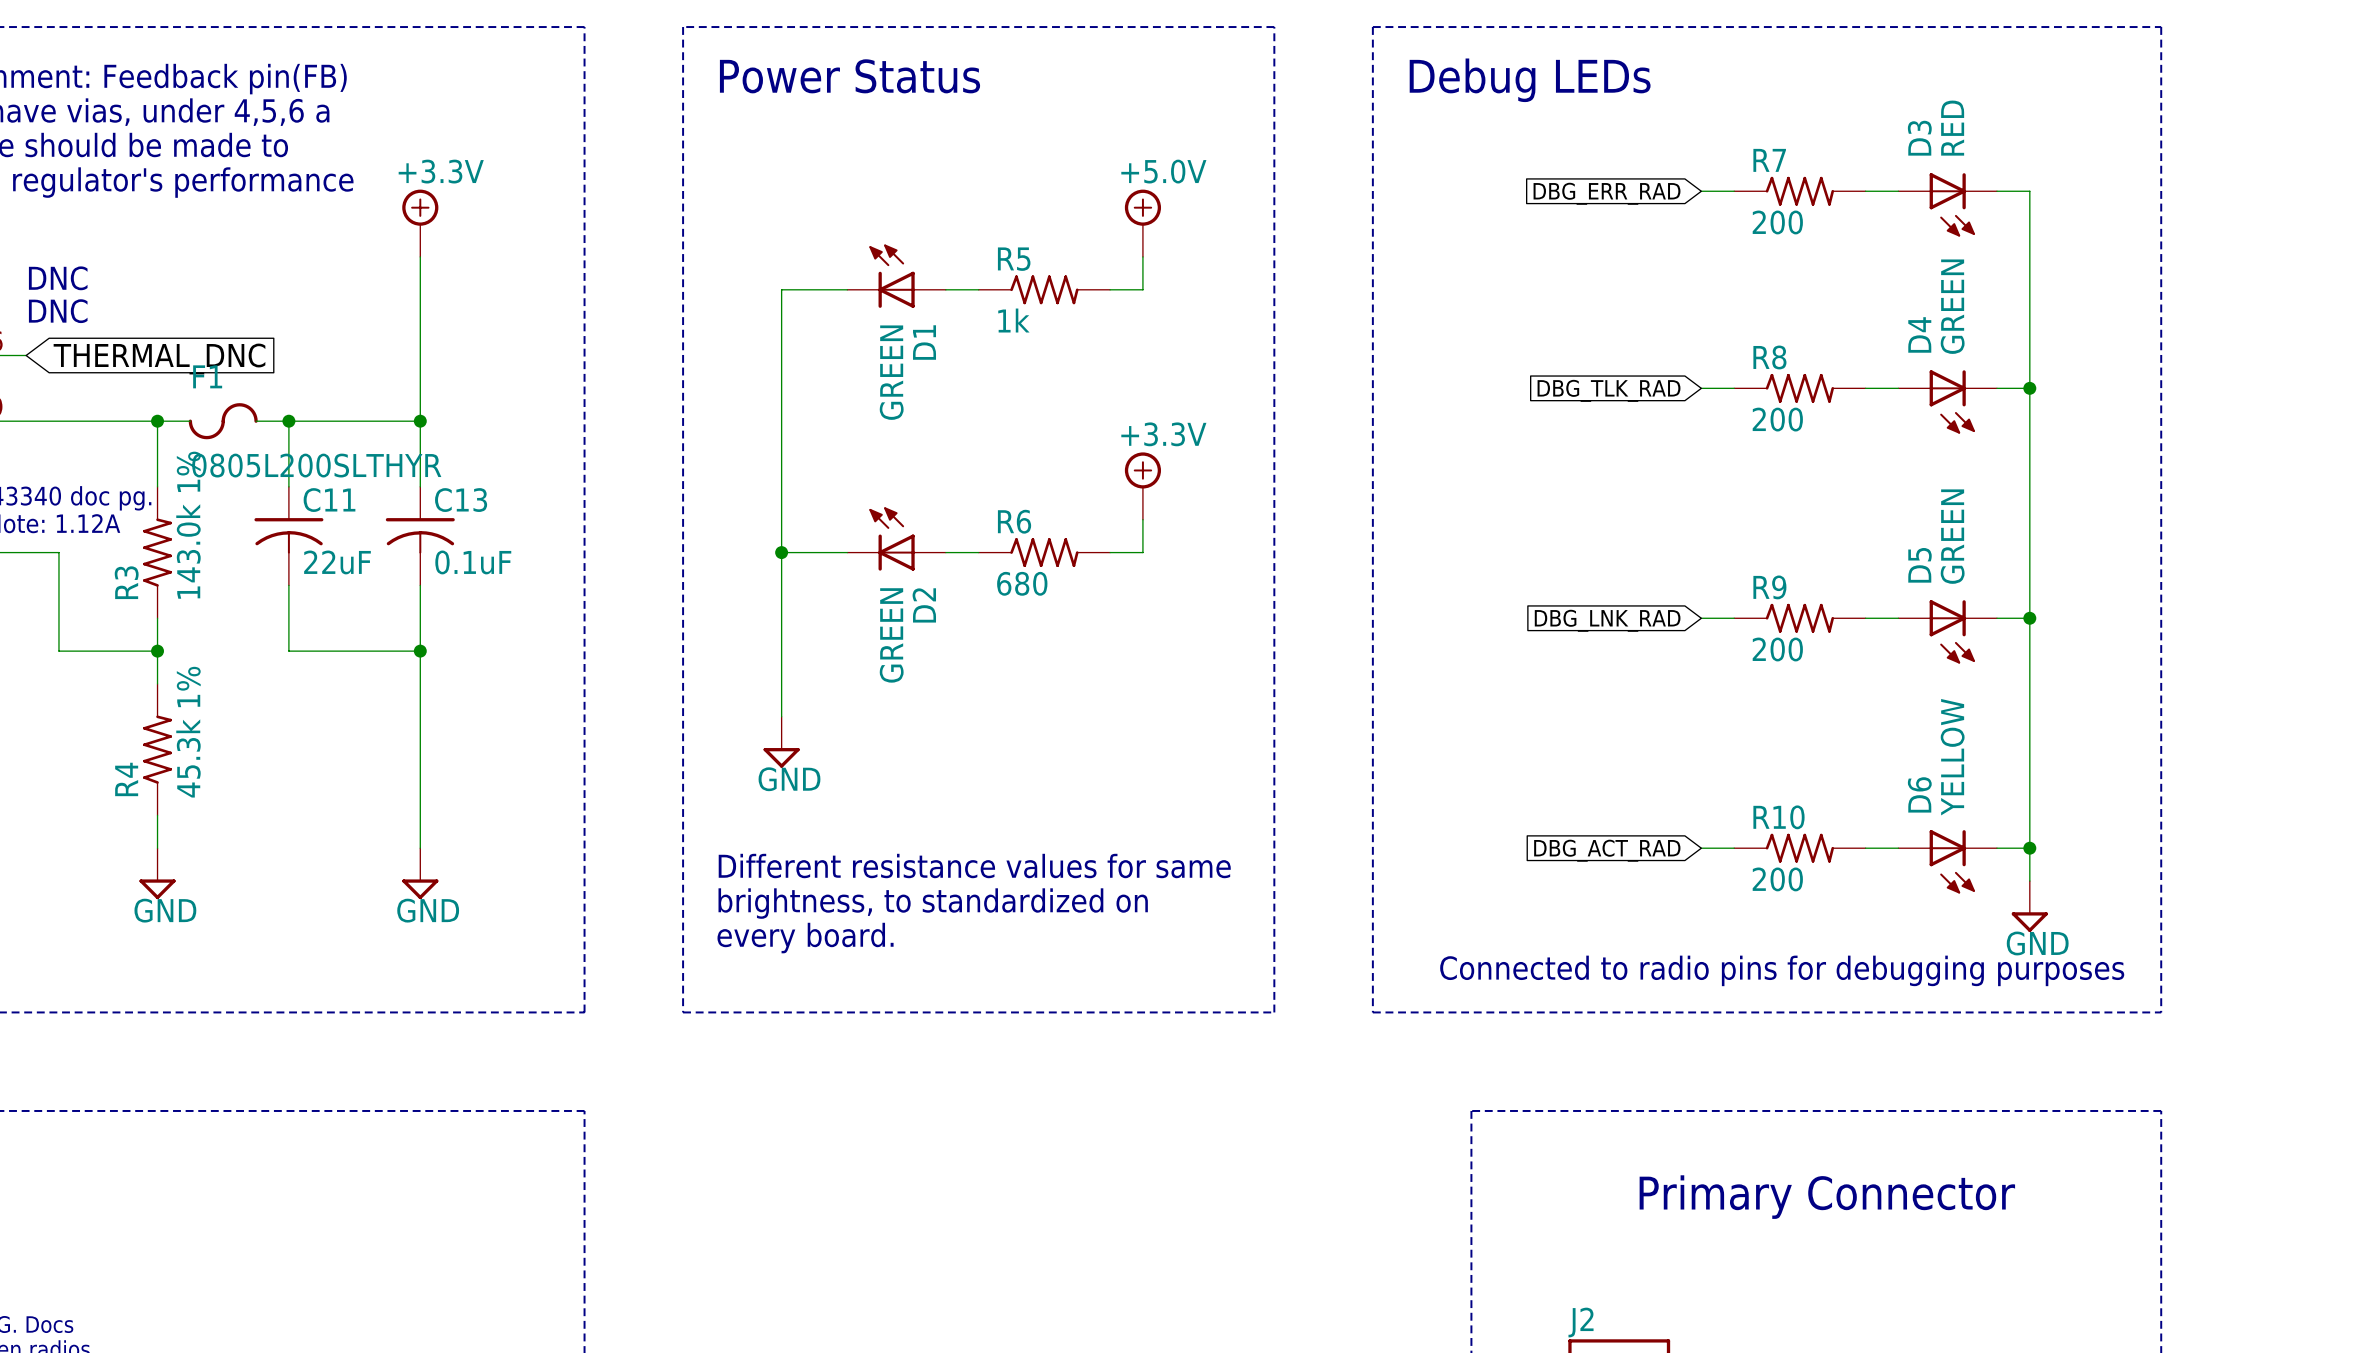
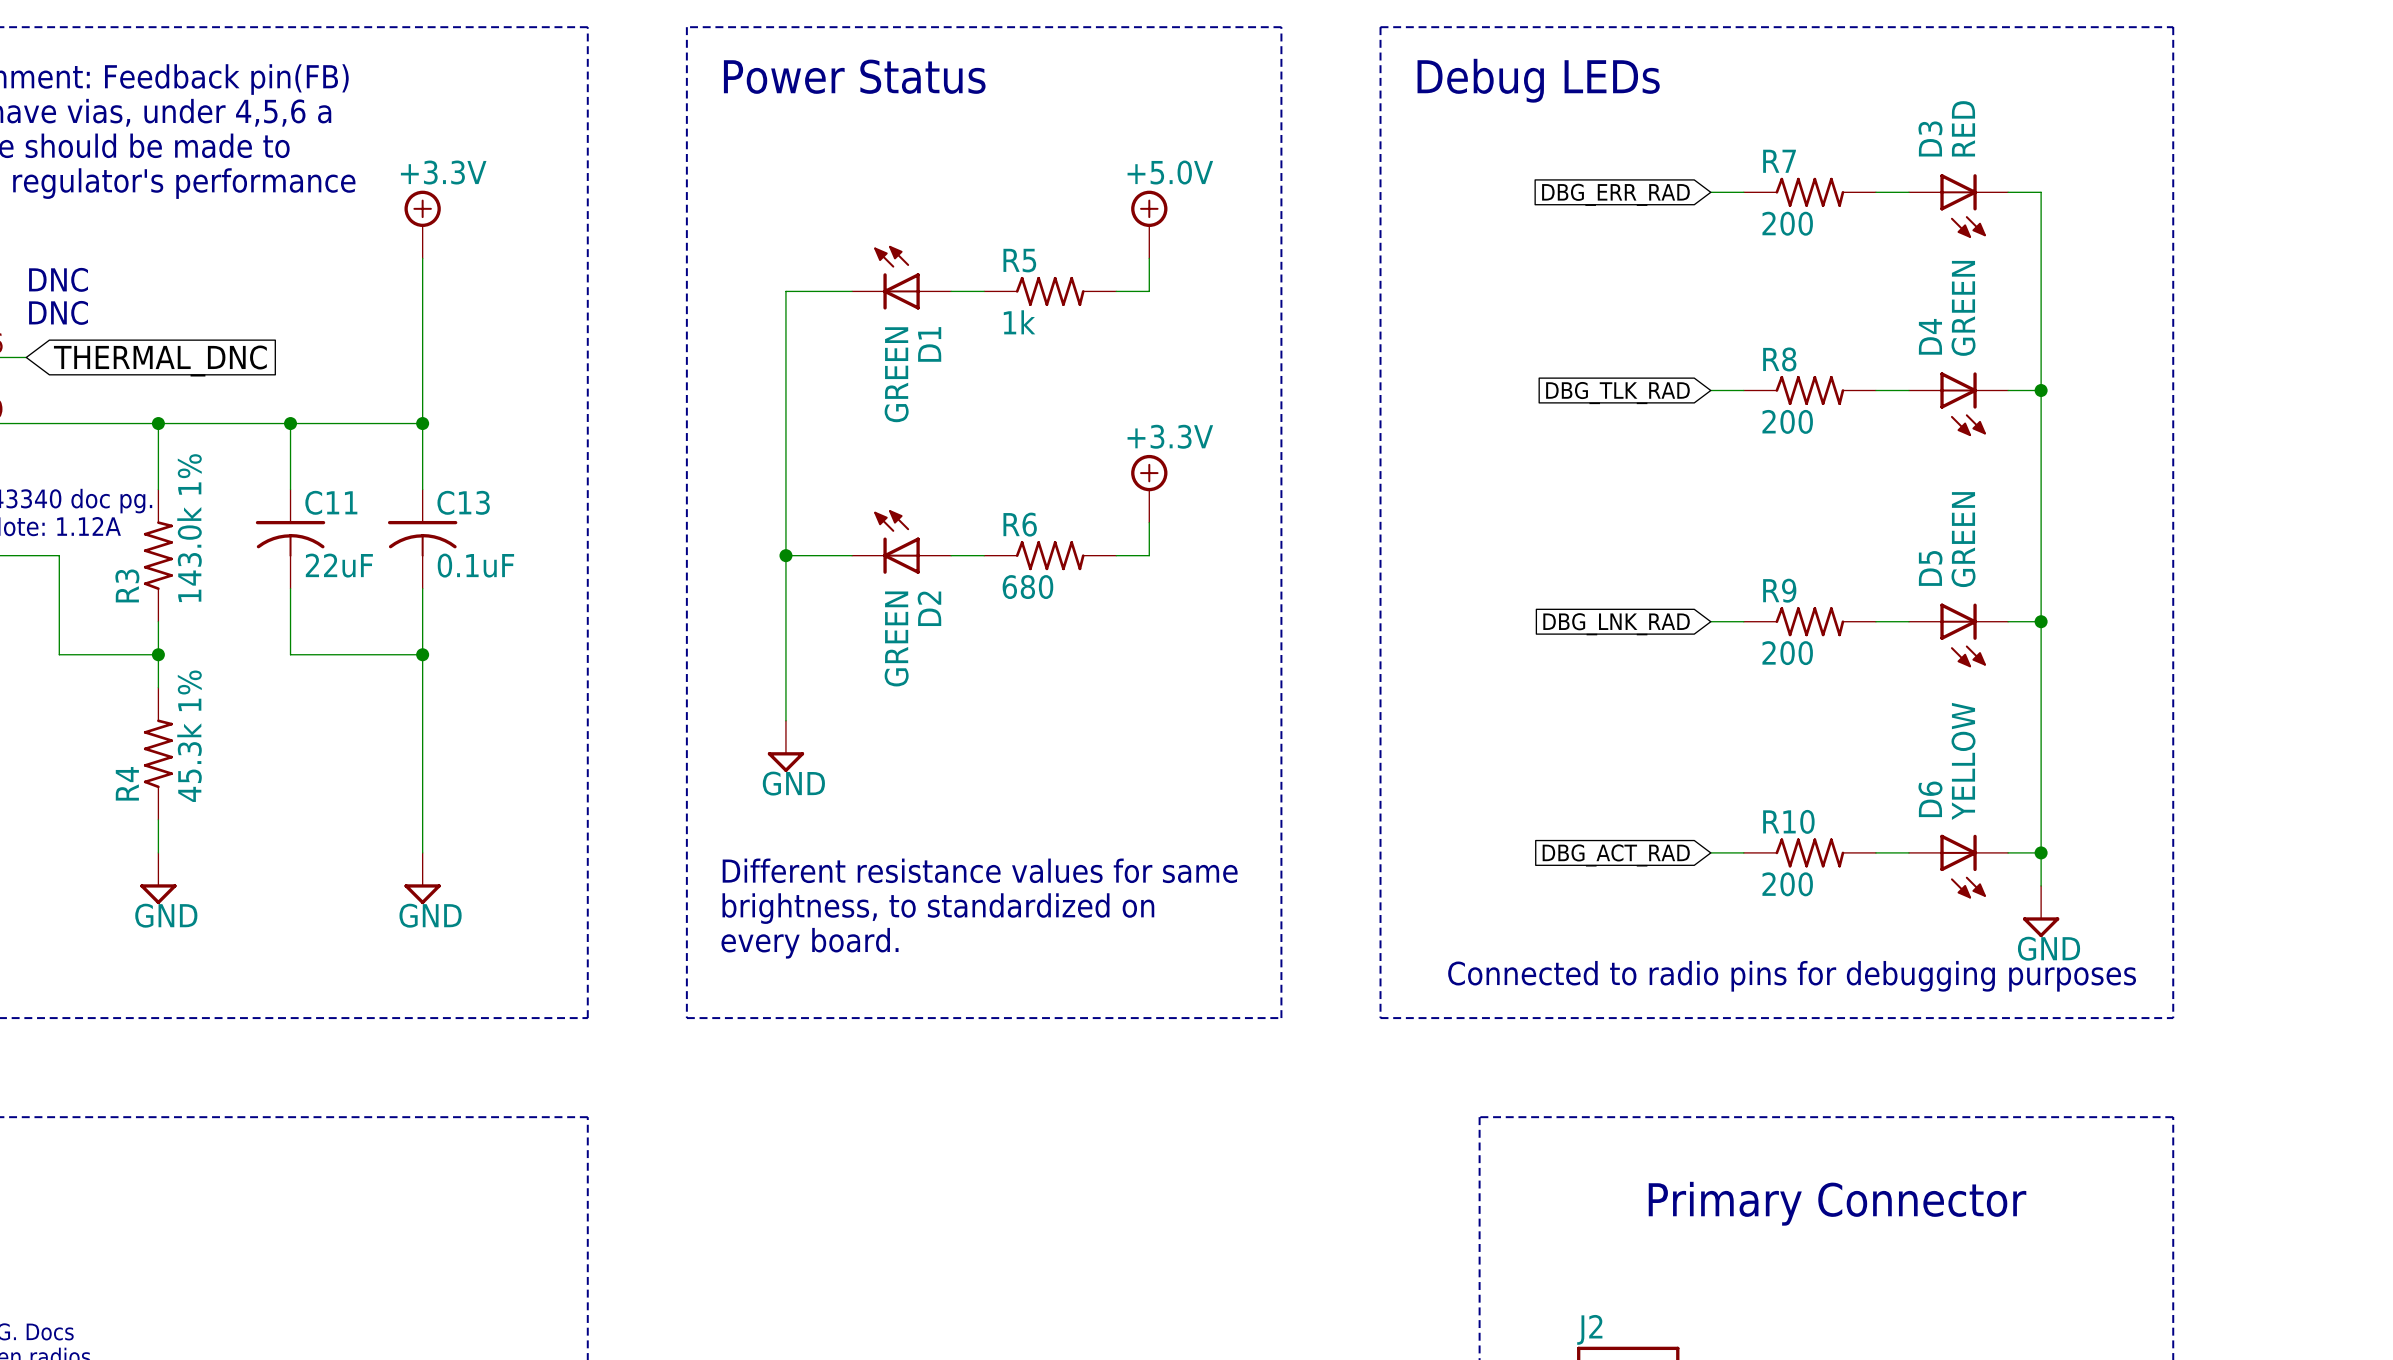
wire: none -> (191, 423) (257, 423)
F1: 0805L200SLTHYR (223, 421) -> none

